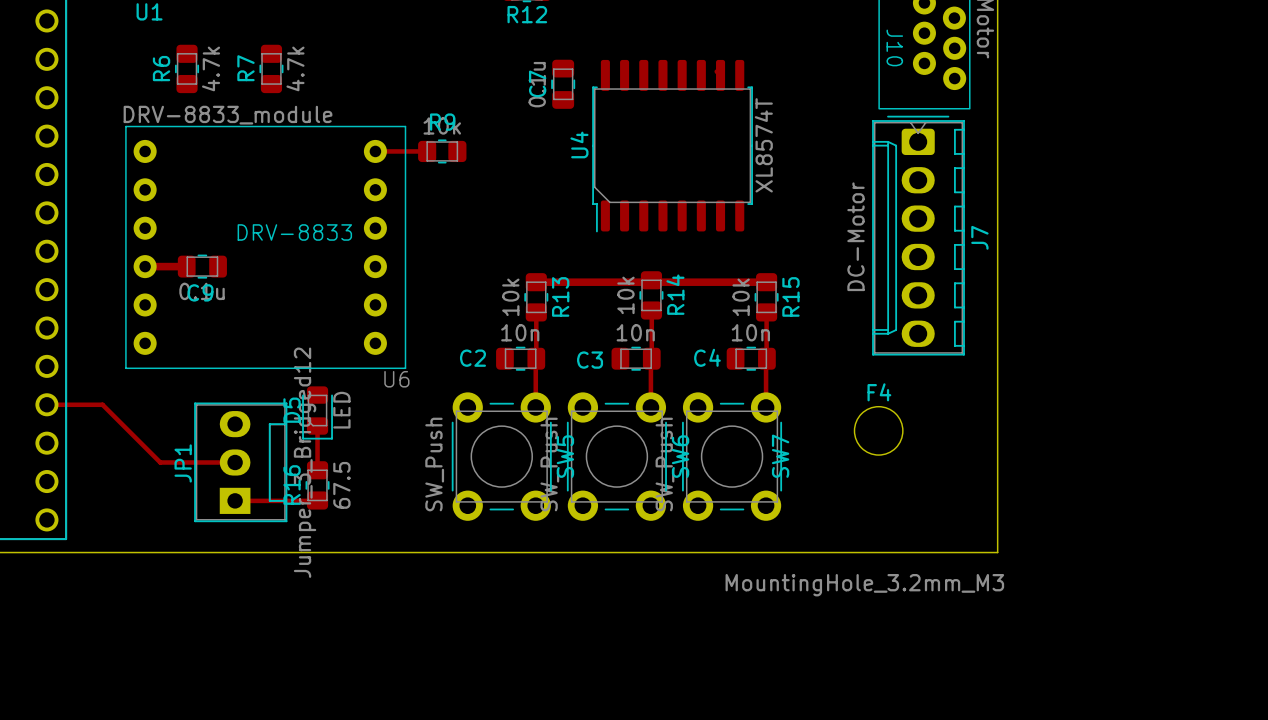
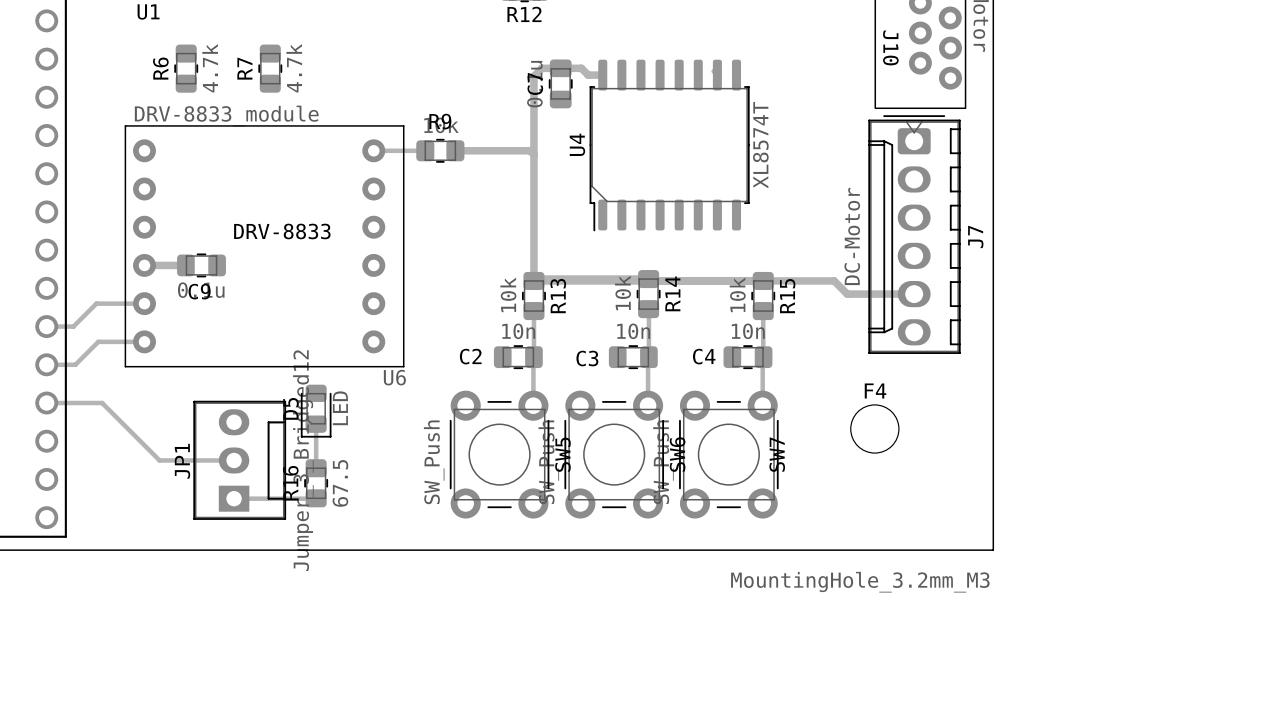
track: none -> (602, 75) (588, 75) (581, 68) (541, 68) (533, 76) (533, 280) (535, 279) (834, 280) (847, 294) (914, 294)
track: none -> (455, 150) (530, 150) (533, 154)
track: none -> (144, 303) (96, 303) (73, 326) (46, 326)
track: none -> (144, 341) (98, 341) (75, 364) (46, 364)

